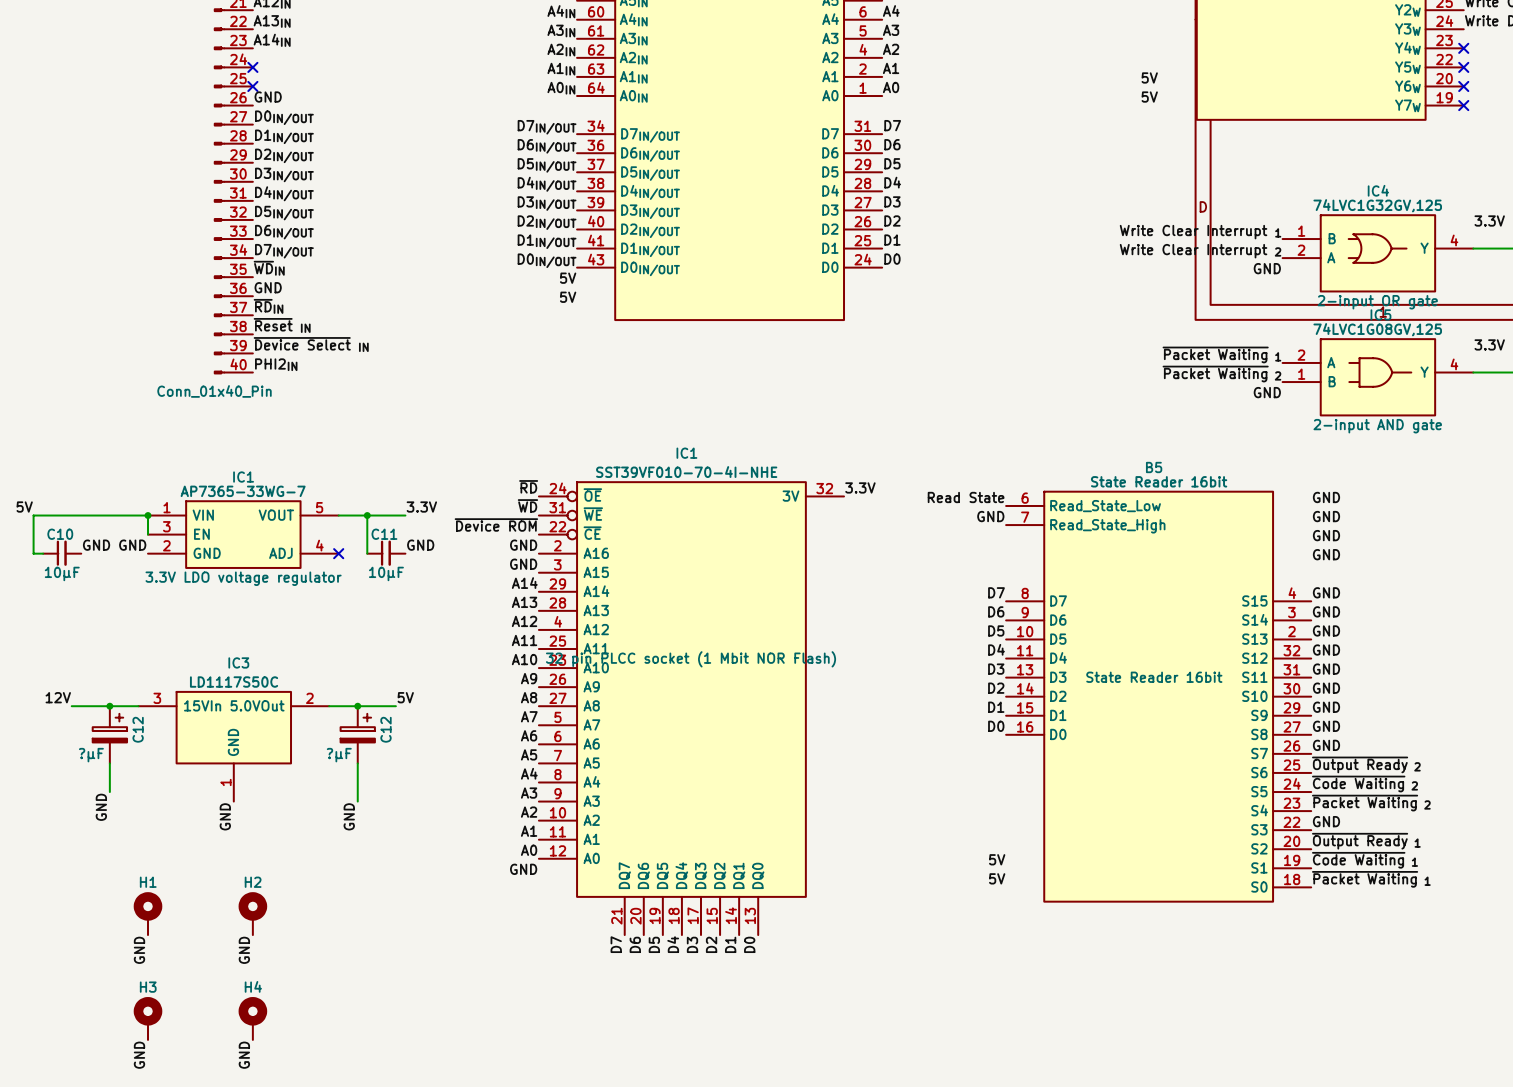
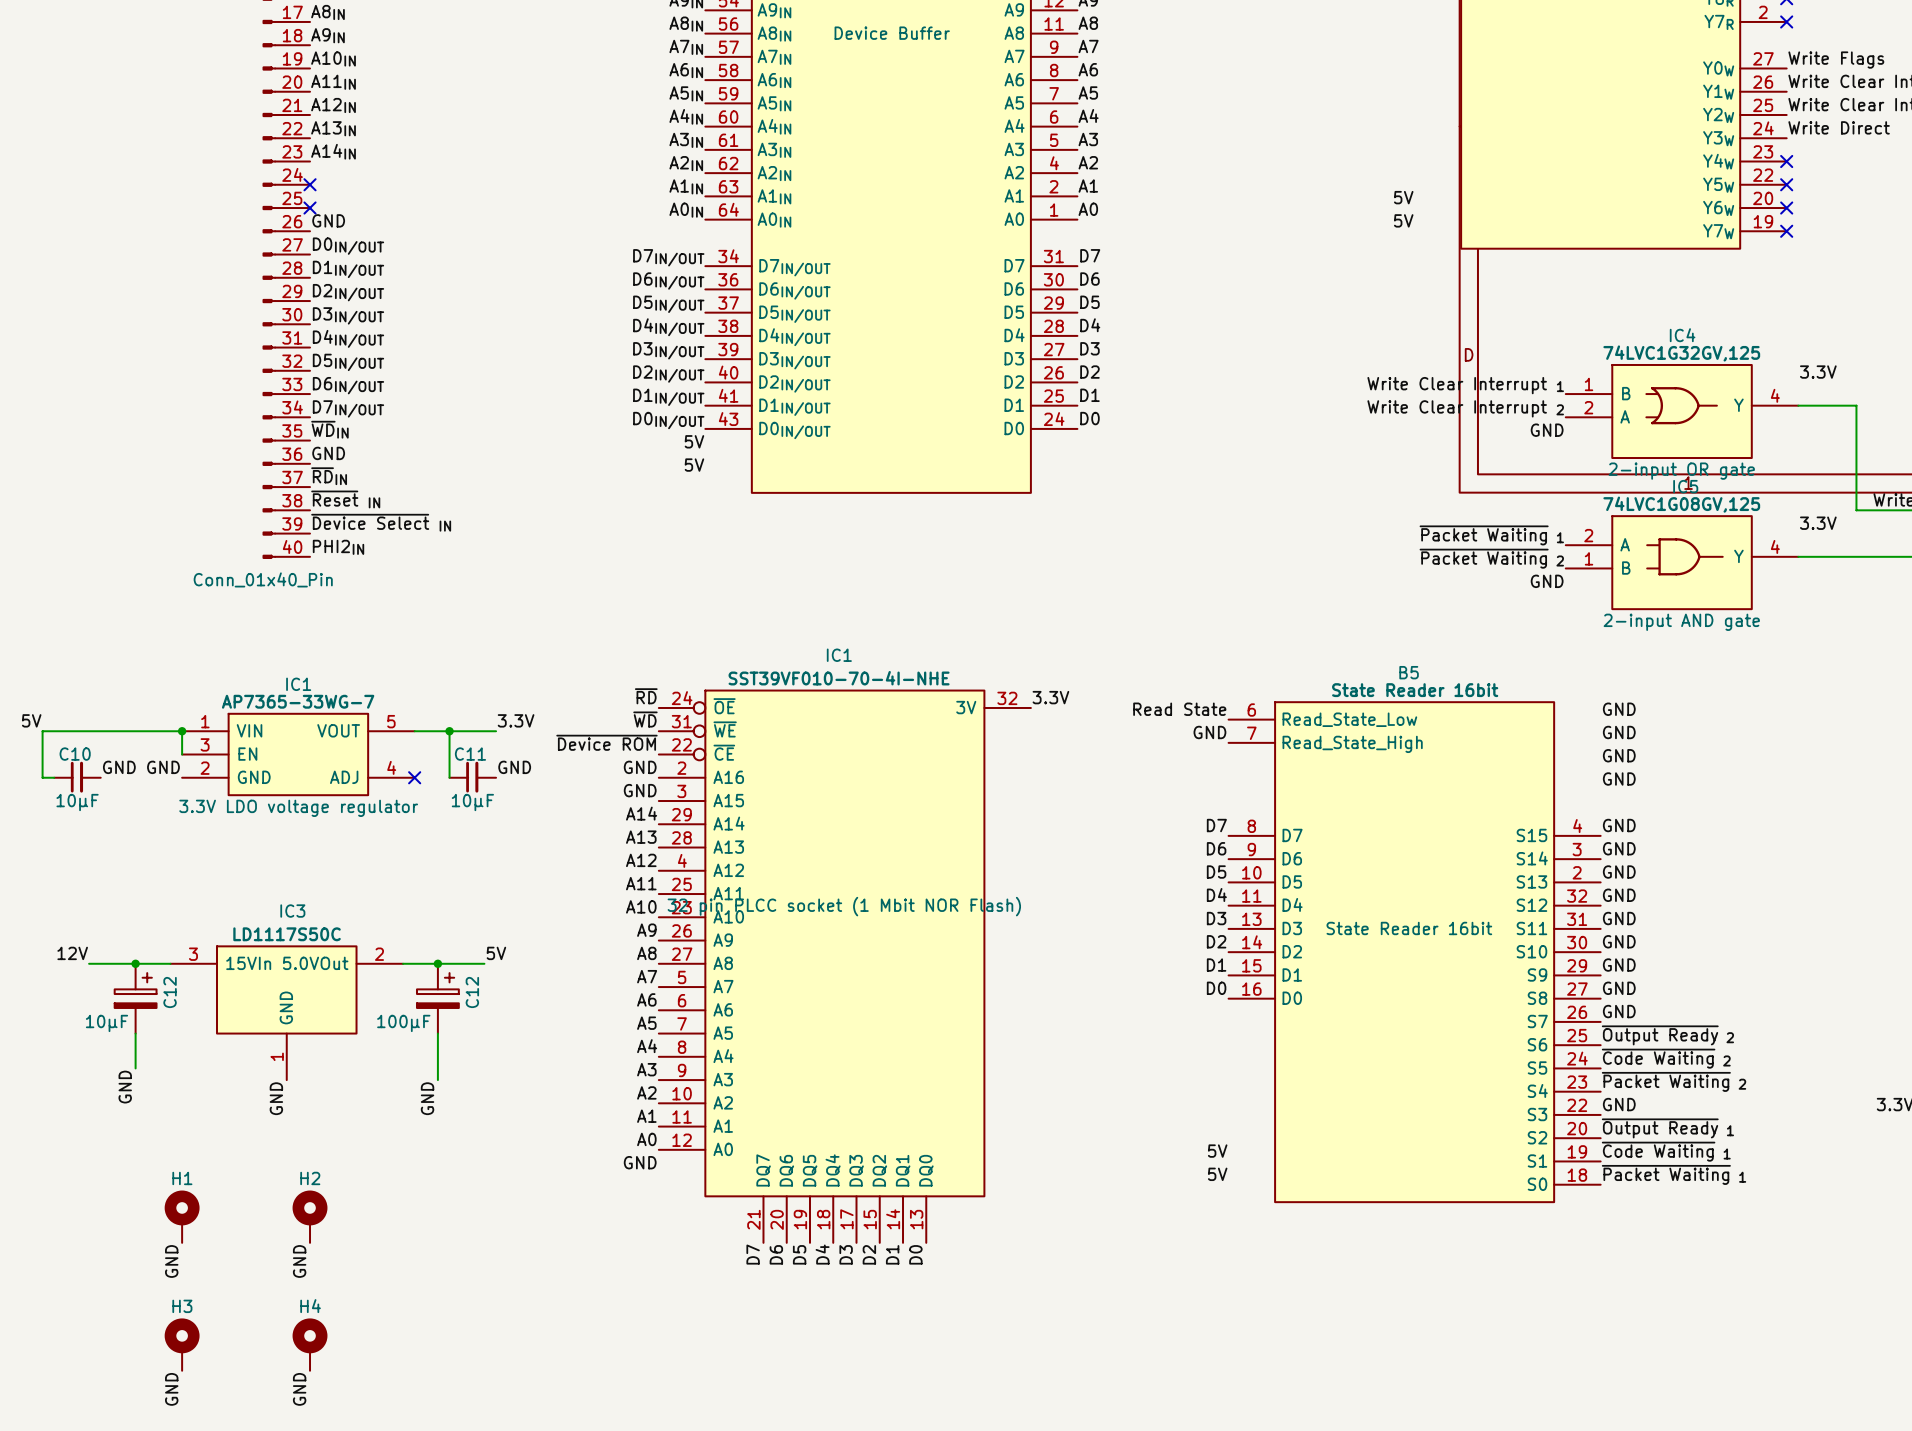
C12 text: ?μF (91, 755) -> 10μF (107, 1023)
C12 text: ?μF (339, 755) -> 100μF (403, 1023)

